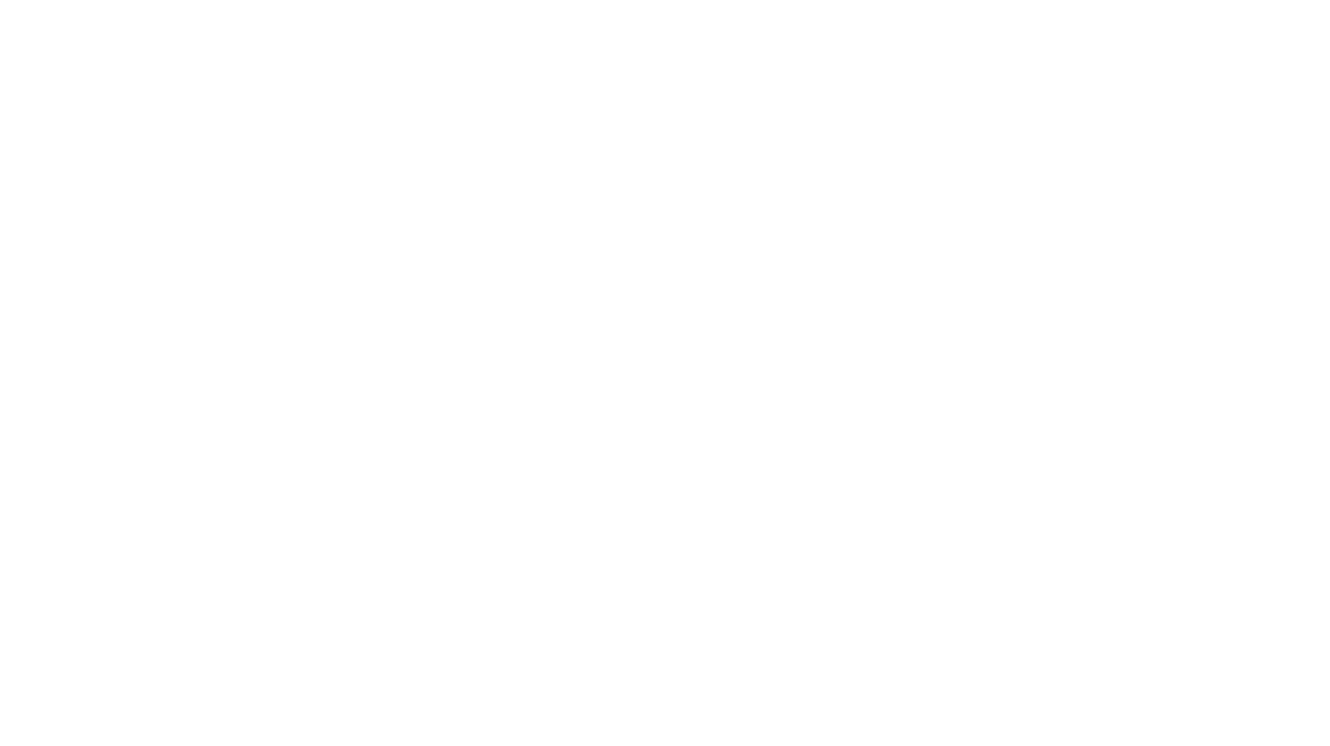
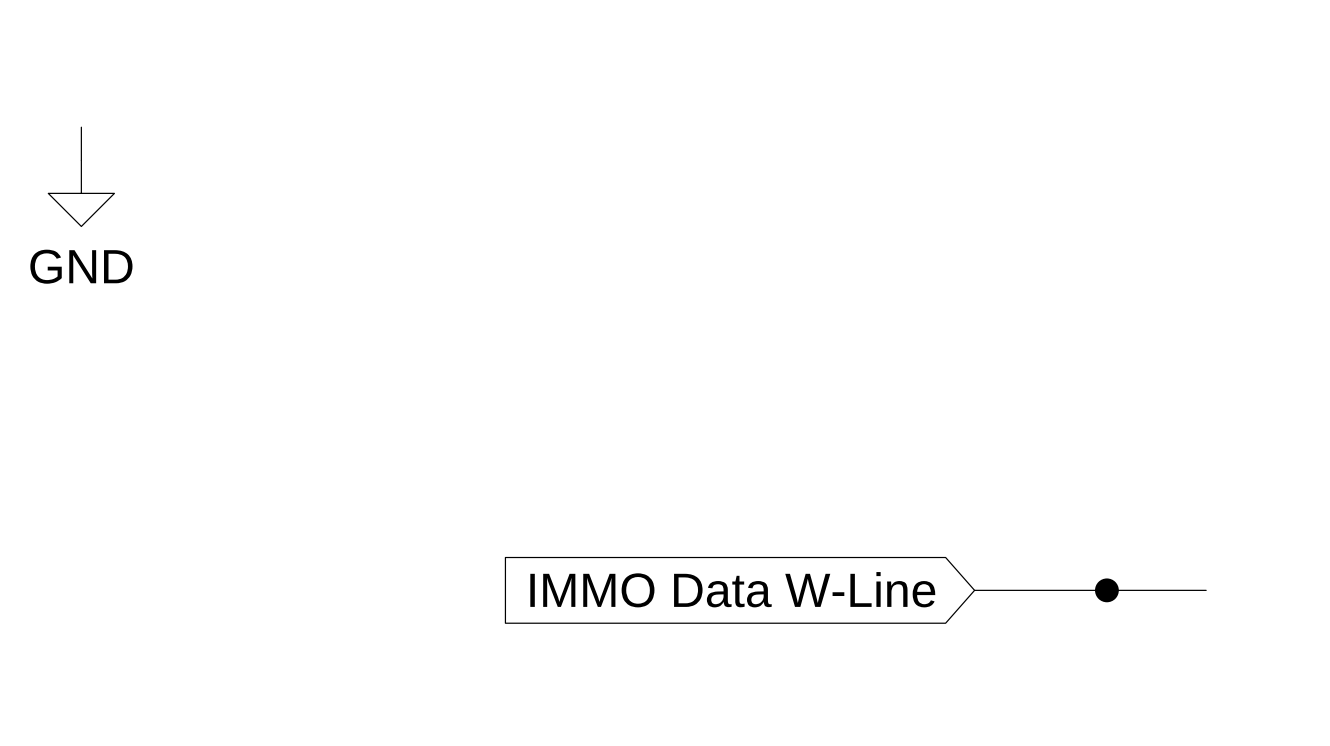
wire: none -> (81, 127) (81, 160)
power symbol: none -> GND (81, 193)
global label: none -> IMMO Data W-Line (732, 589)
wire: none -> (974, 590) (1206, 590)
junction: none -> (1106, 590)

